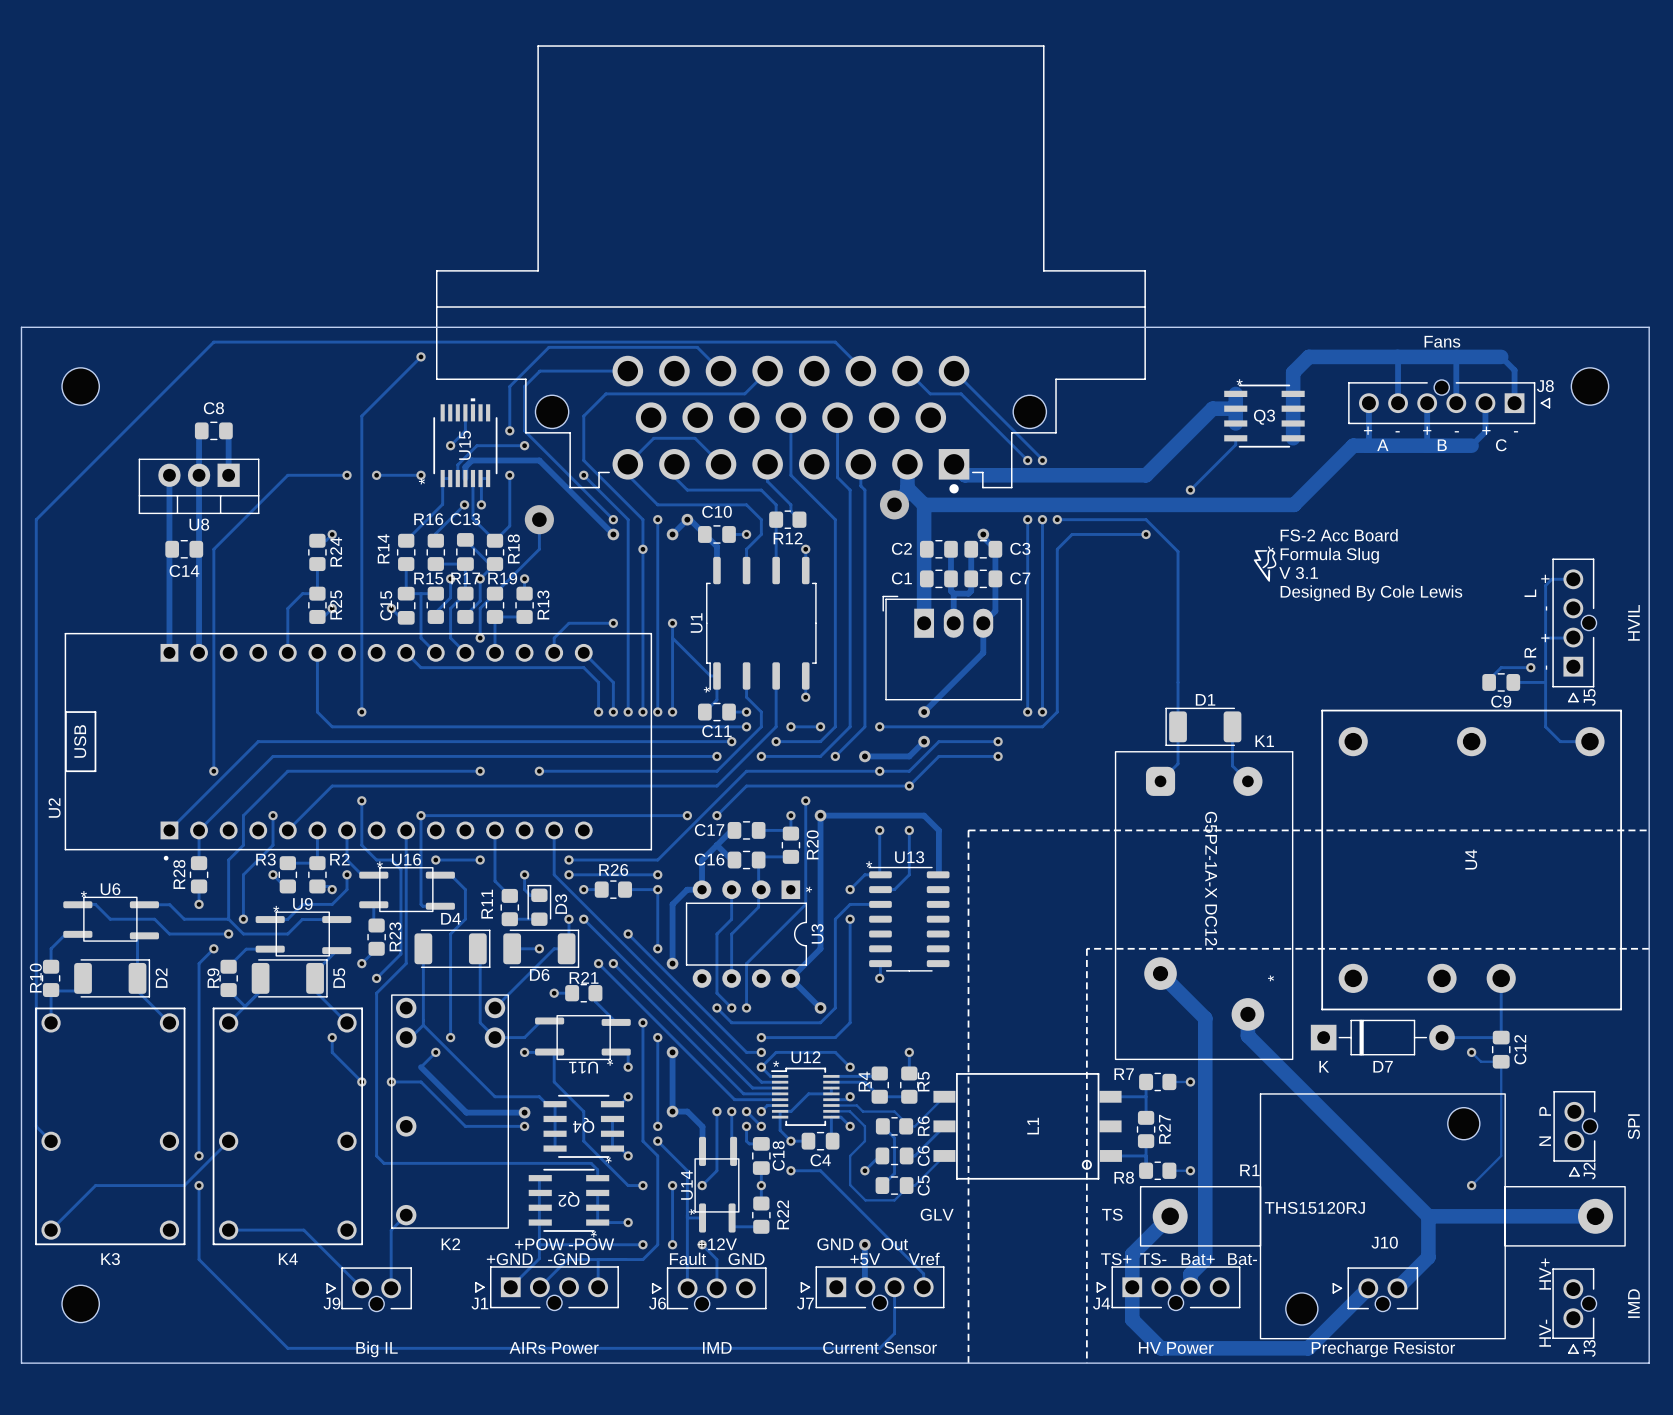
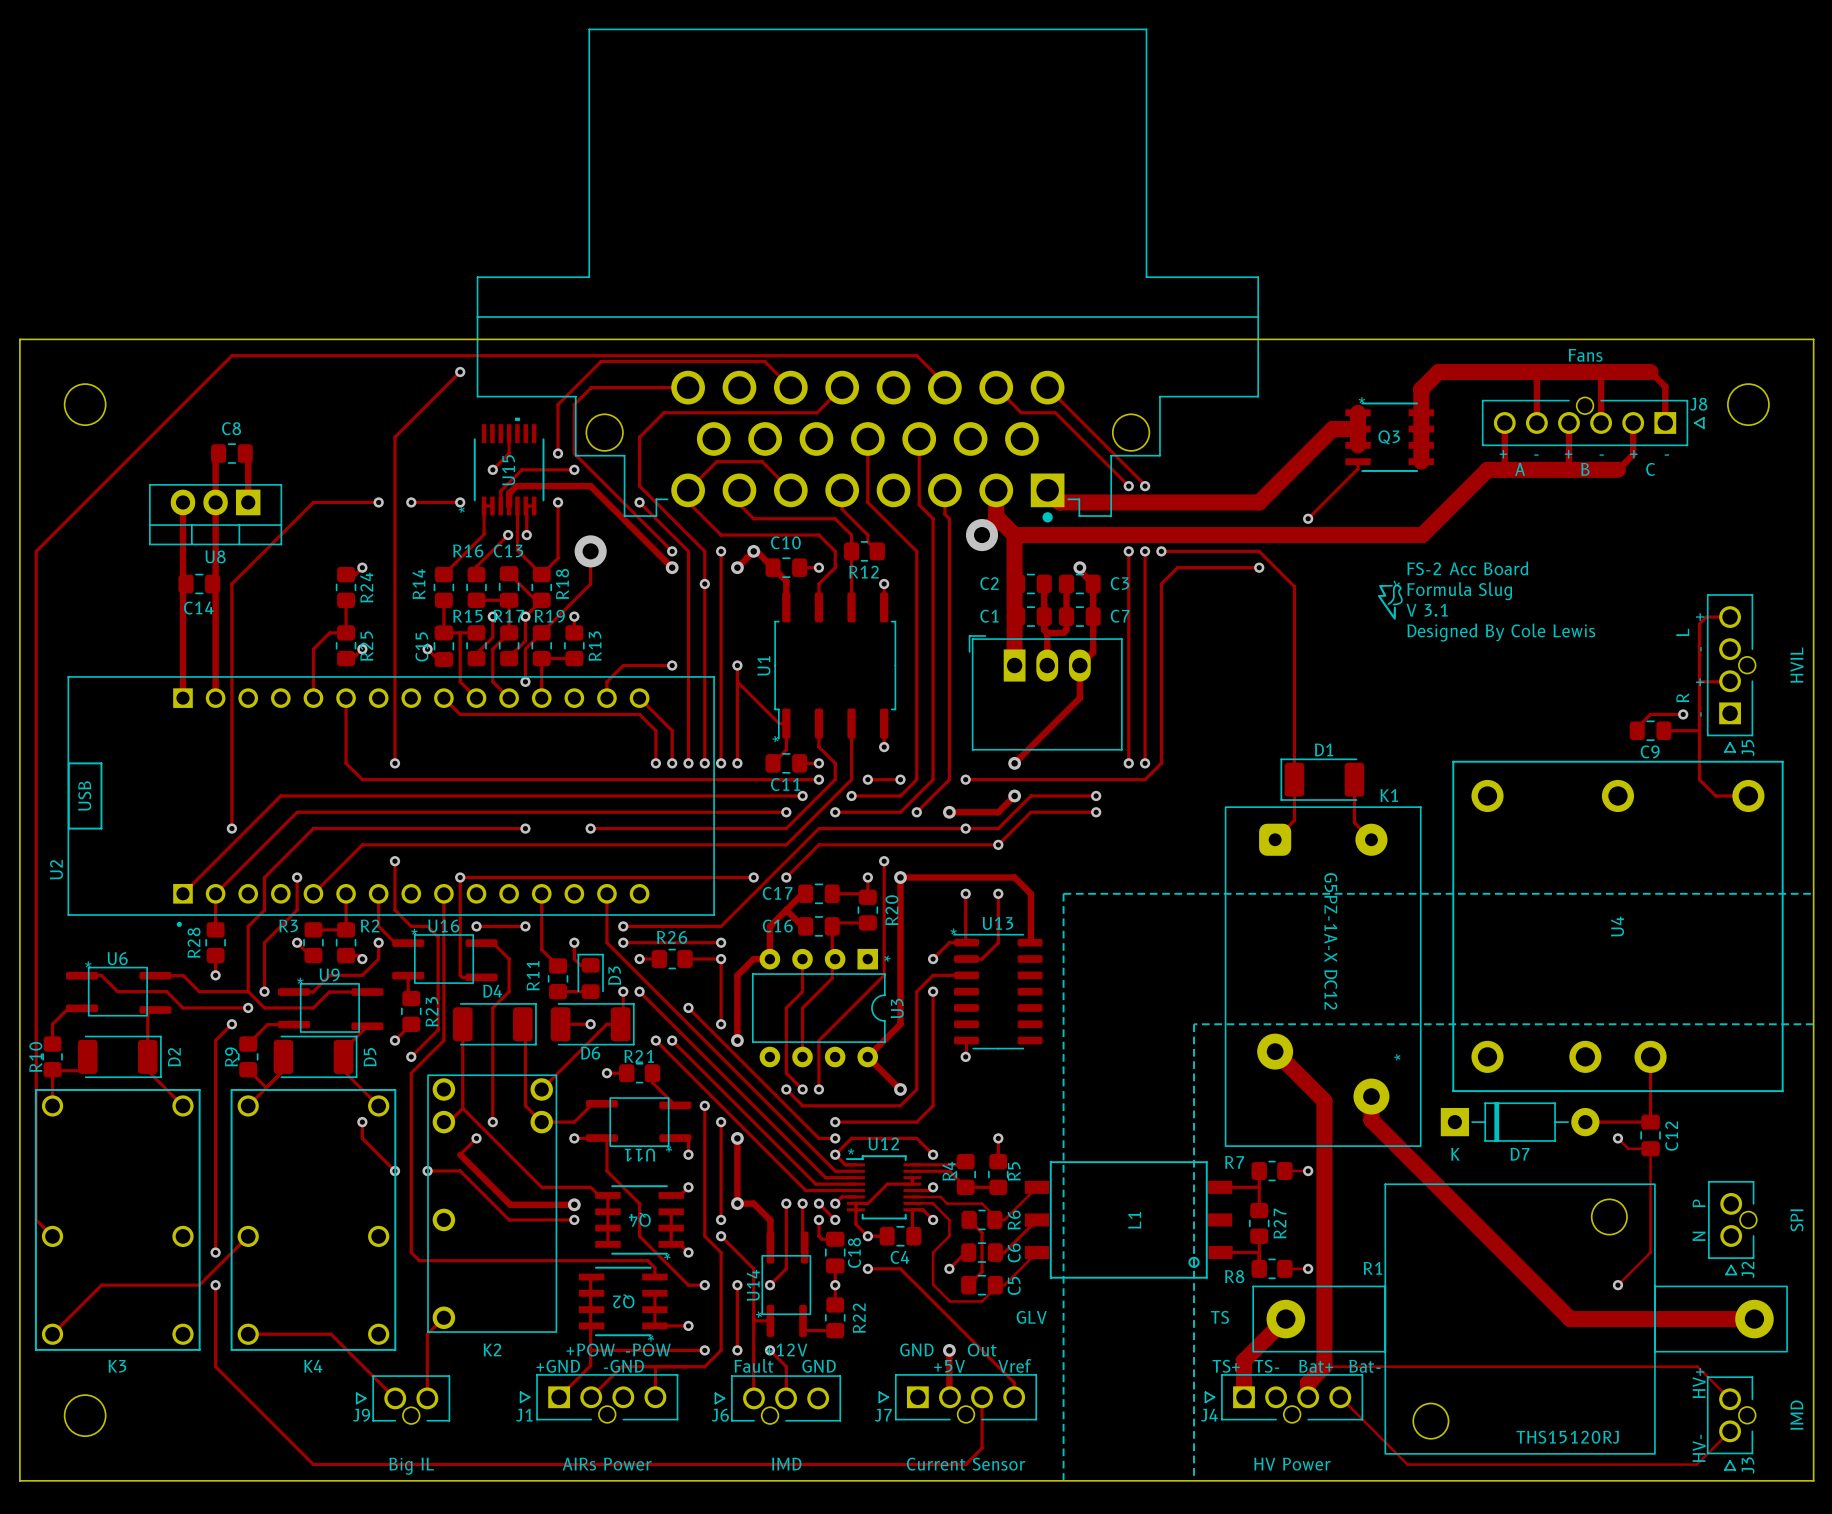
R1 text position: THS15120RJ (1314, 1207) -> THS15120RJ (1567, 1437)
track: (1428, 1216) (1428, 1257) (1397, 1288) -> none
track: none -> (1324, 1366) (1697, 1366) (1730, 1399)
track: (1132, 1287) (1132, 1319) (1160, 1348) (1280, 1348) -> (1340, 1397) (1407, 1464)
track: (1368, 1288) (1308, 1348) -> (1730, 1431) (1696, 1464) (1437, 1464)
J10: Precharge Resistor (1375, 1289) -> none
track width: thick (1280, 1348) (1308, 1348) -> thin (1407, 1464) (1437, 1464)

